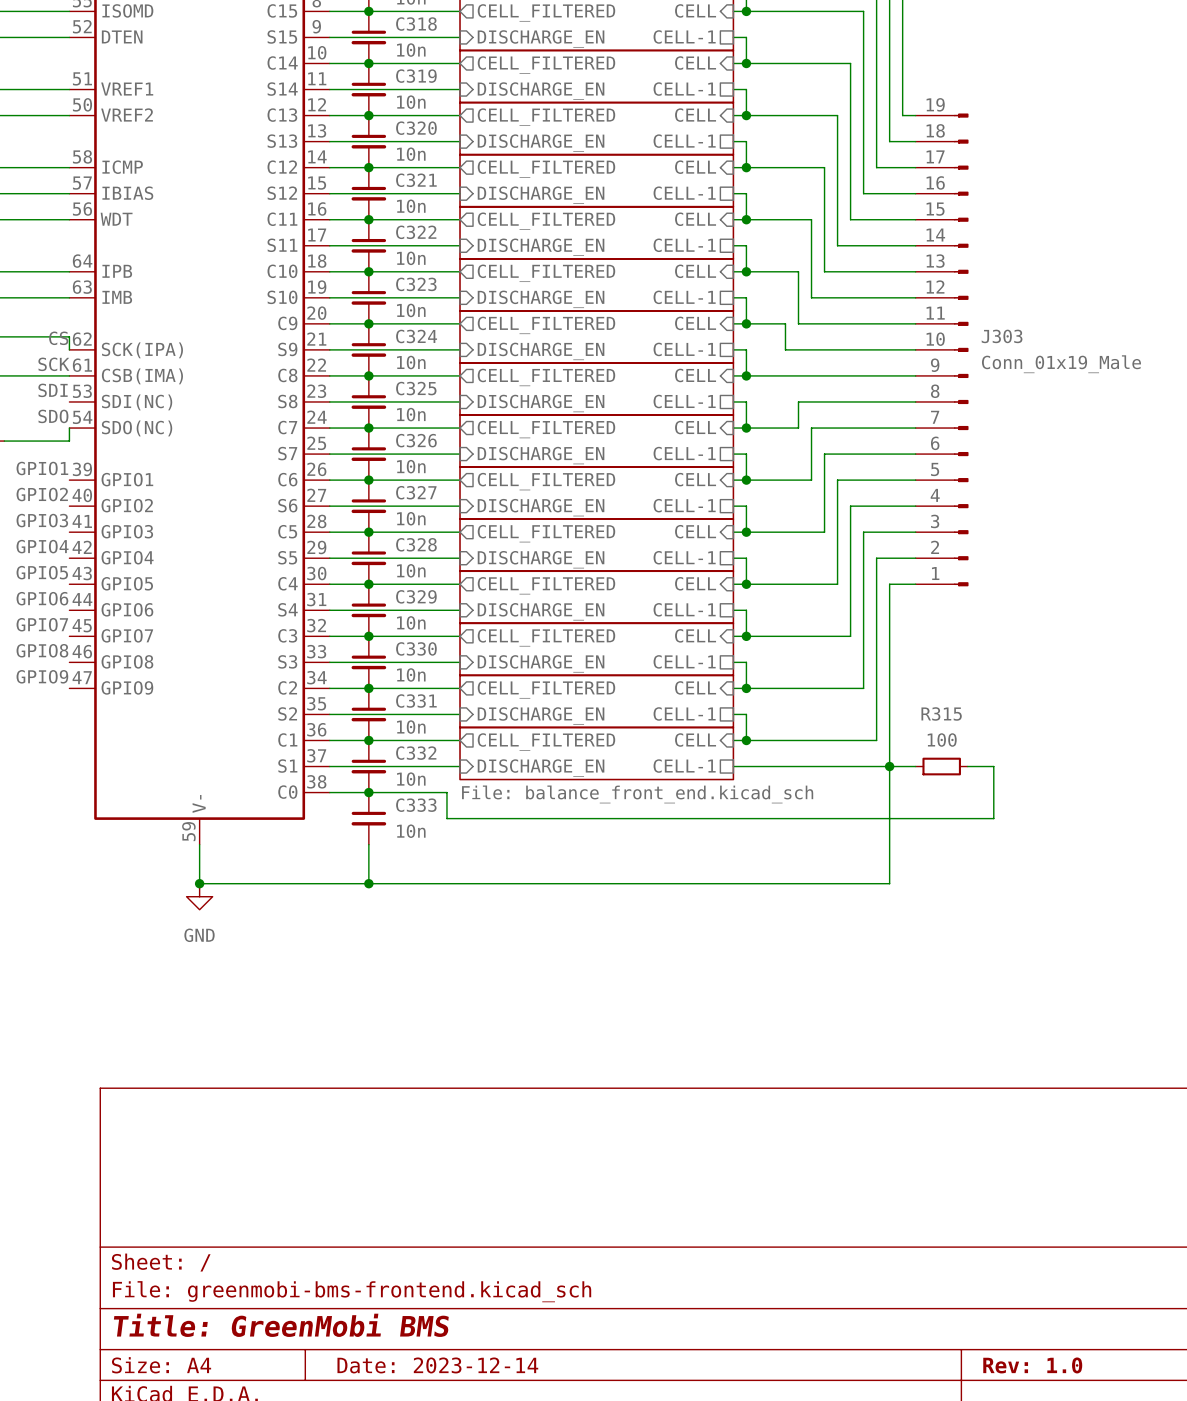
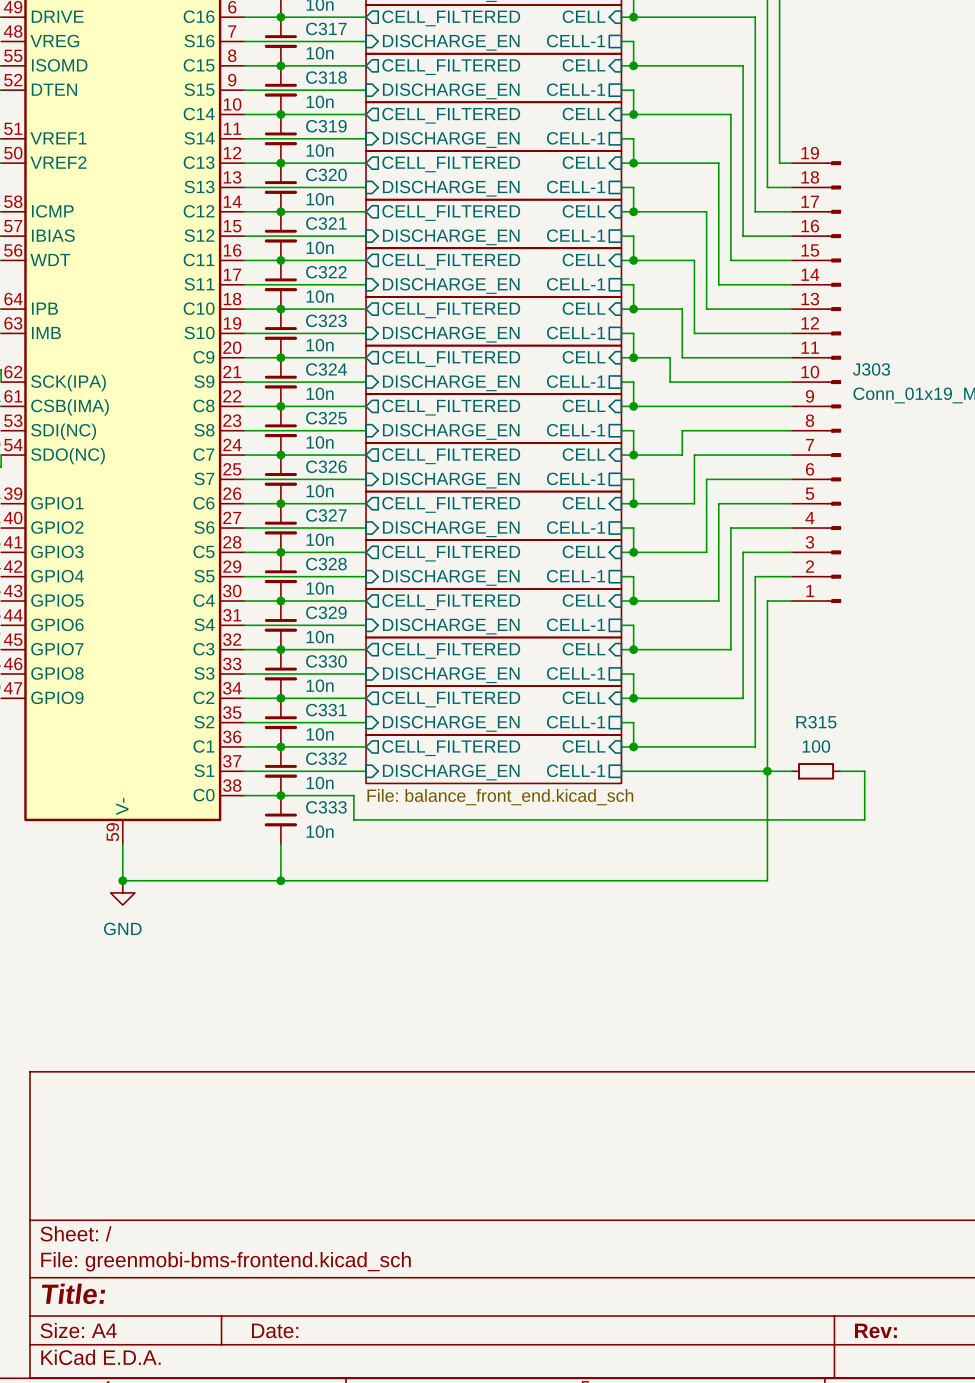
title block: Title: GreenMobi BMS (281, 1325) -> Title: (73, 1293)
title block: Date: 2023-12-14 (437, 1365) -> Date: (275, 1330)
title block: Rev: 1.0 (1032, 1365) -> Rev: (875, 1330)

